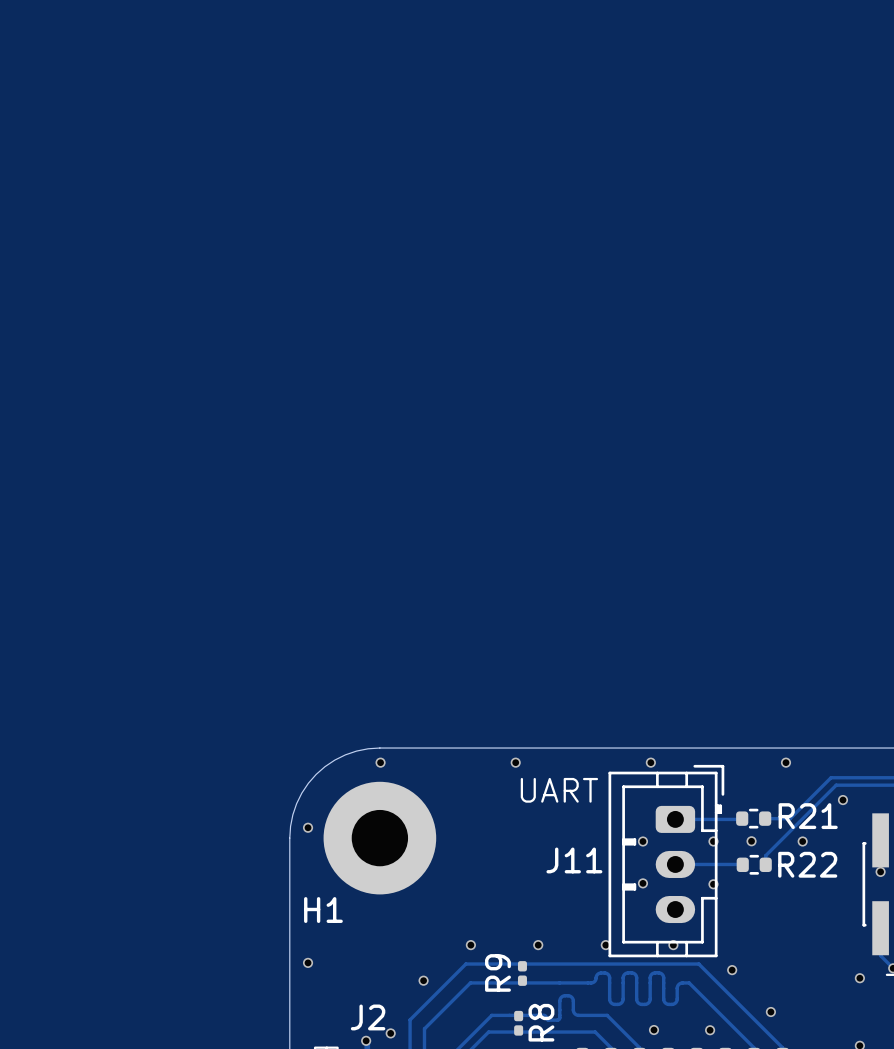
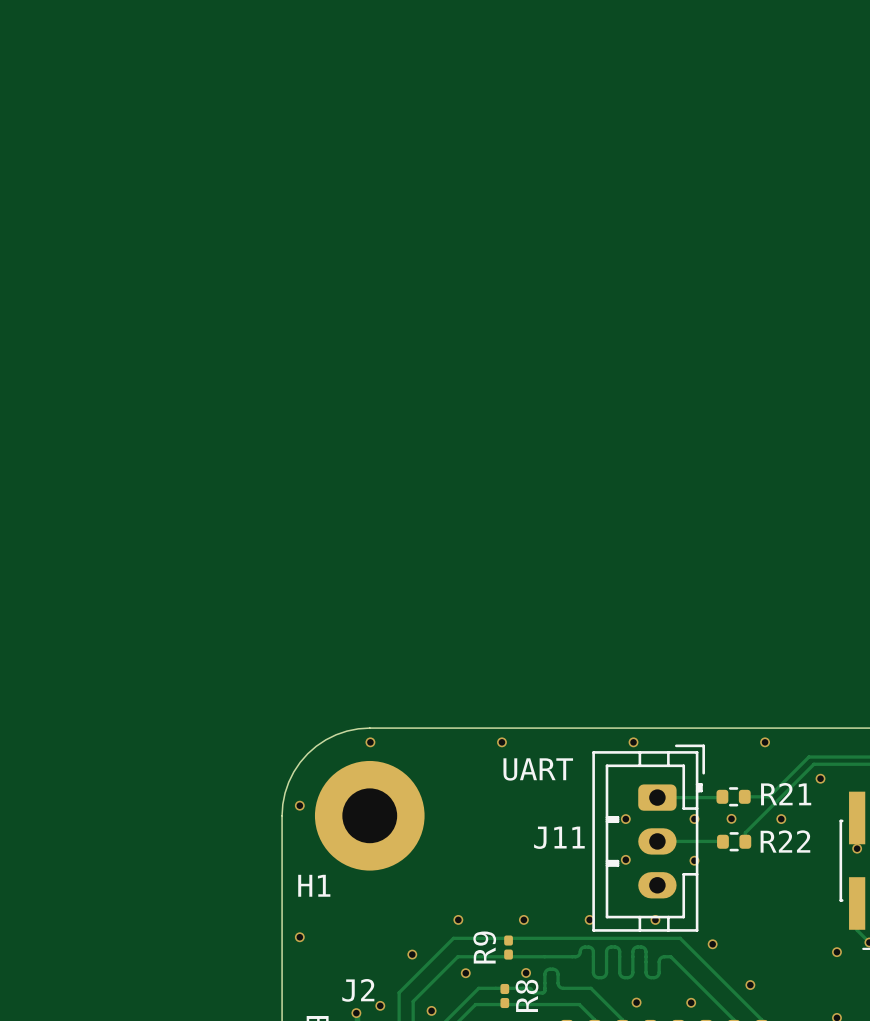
via: none -> (465, 973)
via: none -> (526, 972)
via: none -> (431, 1010)

